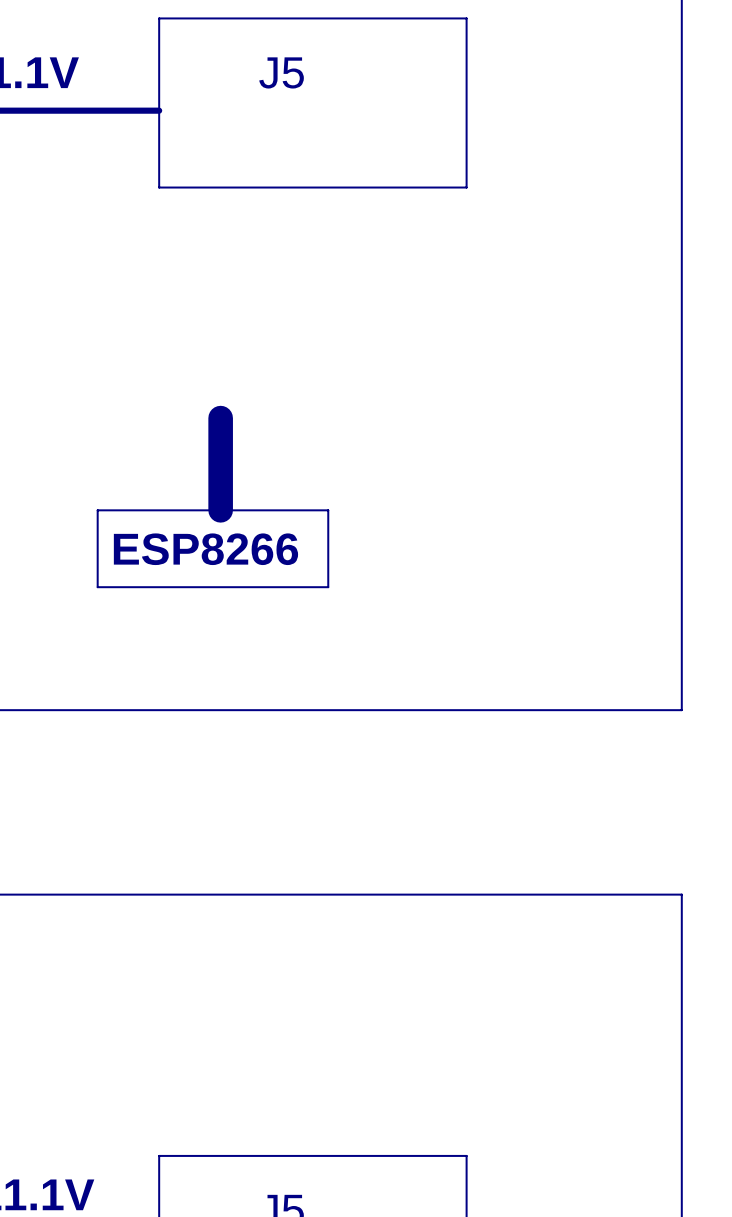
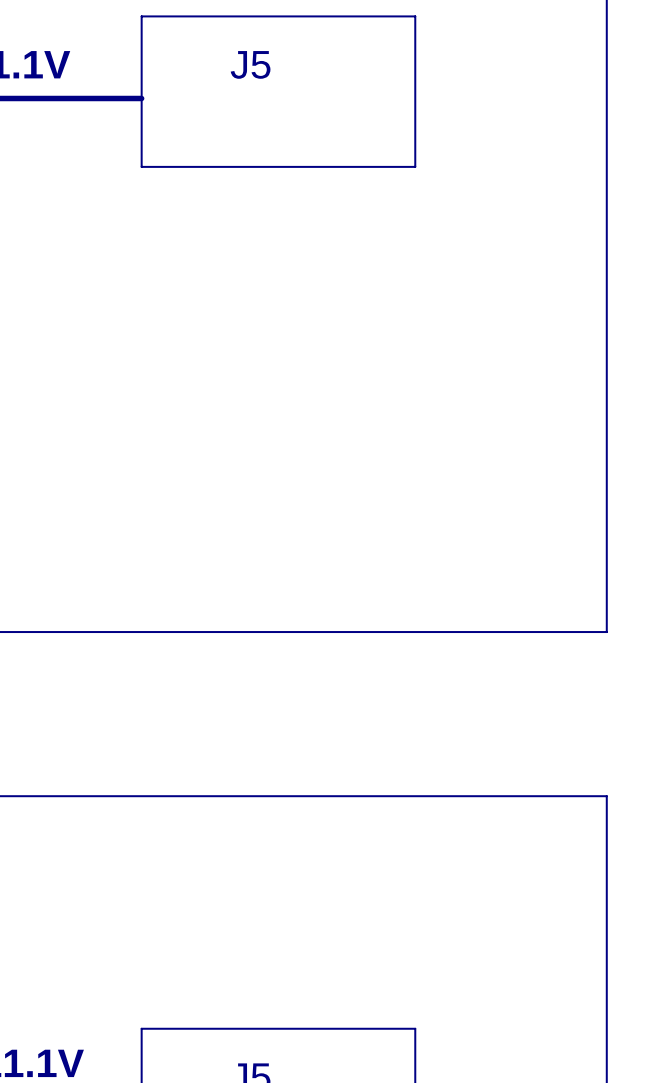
line: (220, 418) (220, 510) -> none
line: (97, 510) (328, 510) (328, 587) (97, 587) (97, 510) -> none
text: ESP8266 (205, 549) -> none

